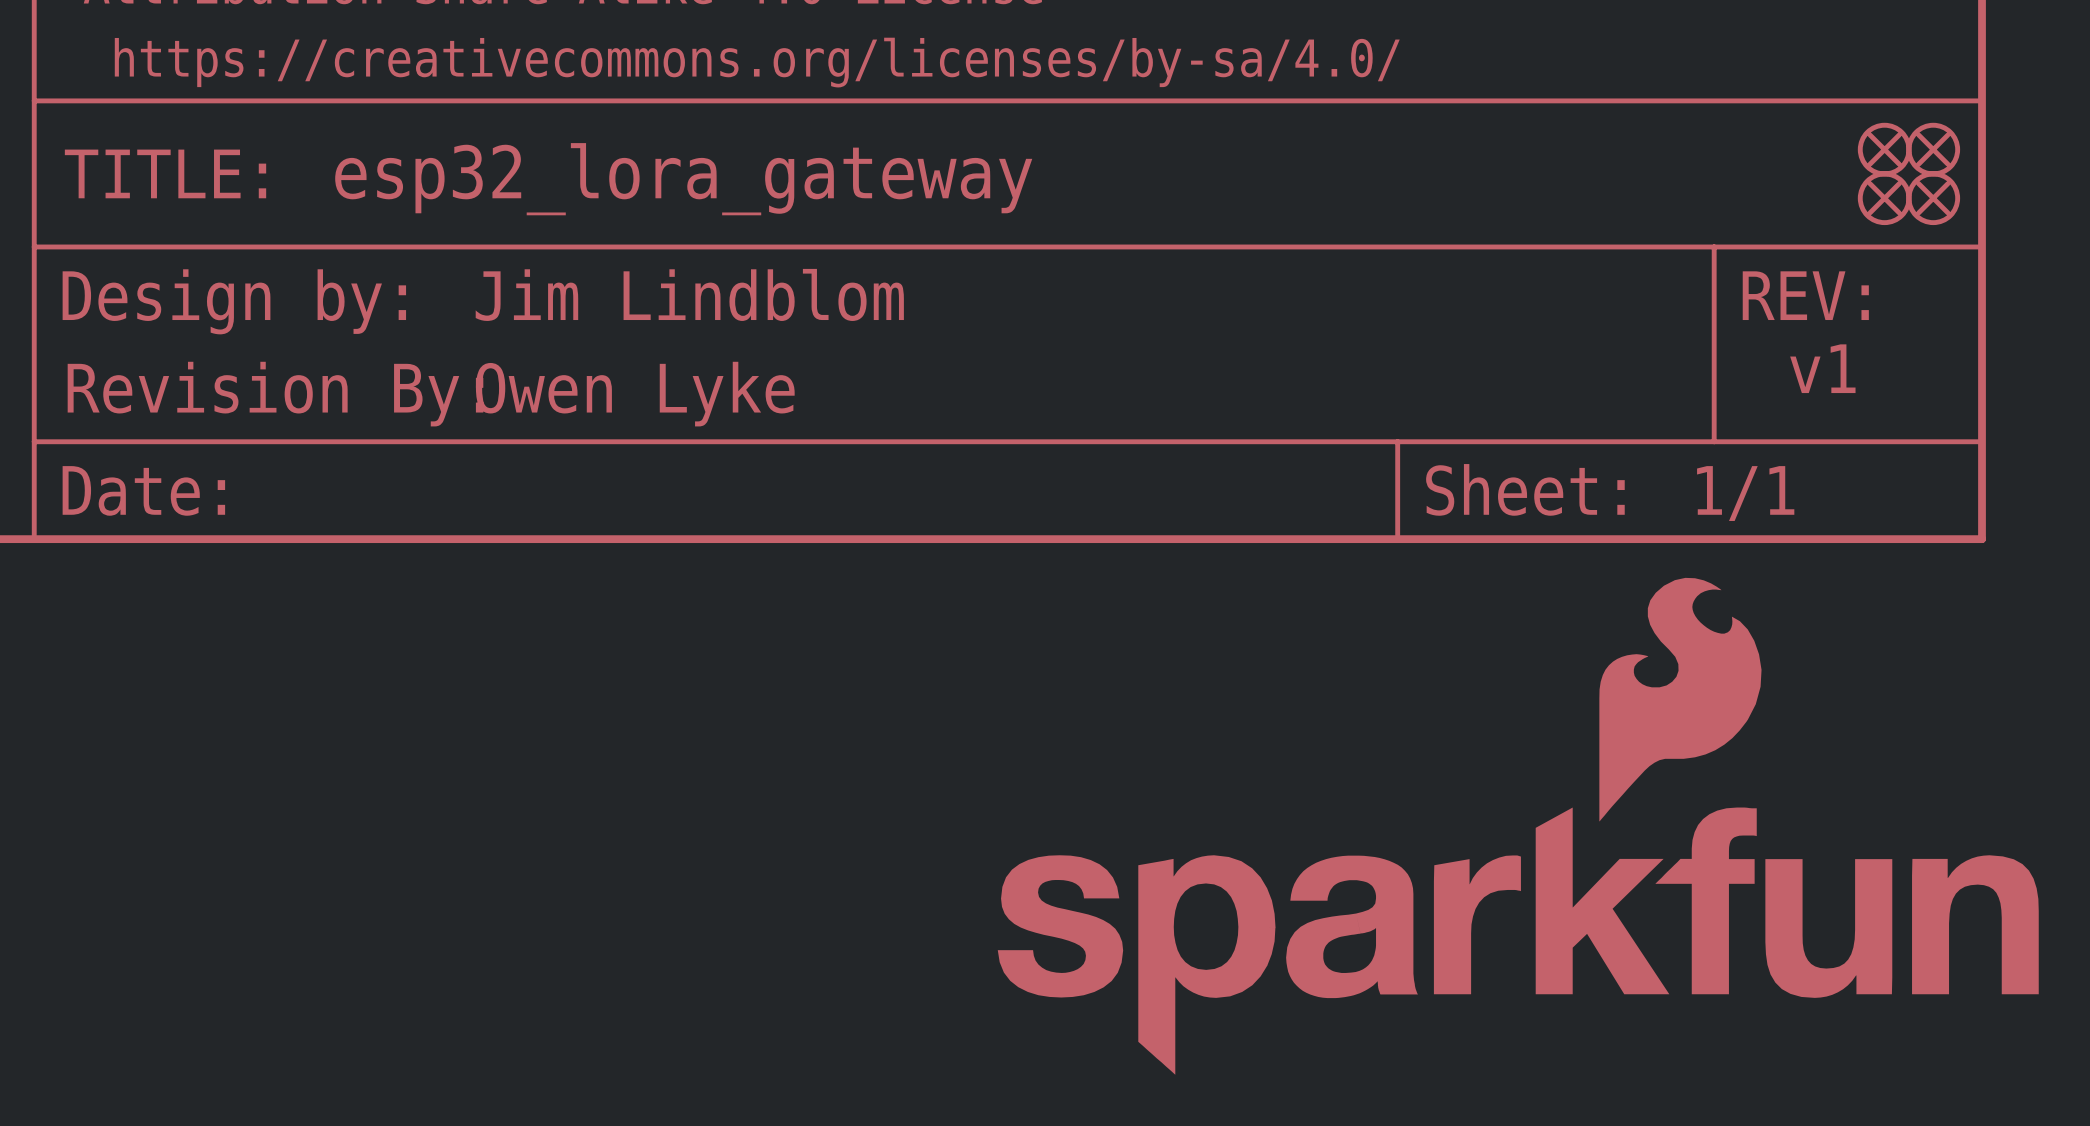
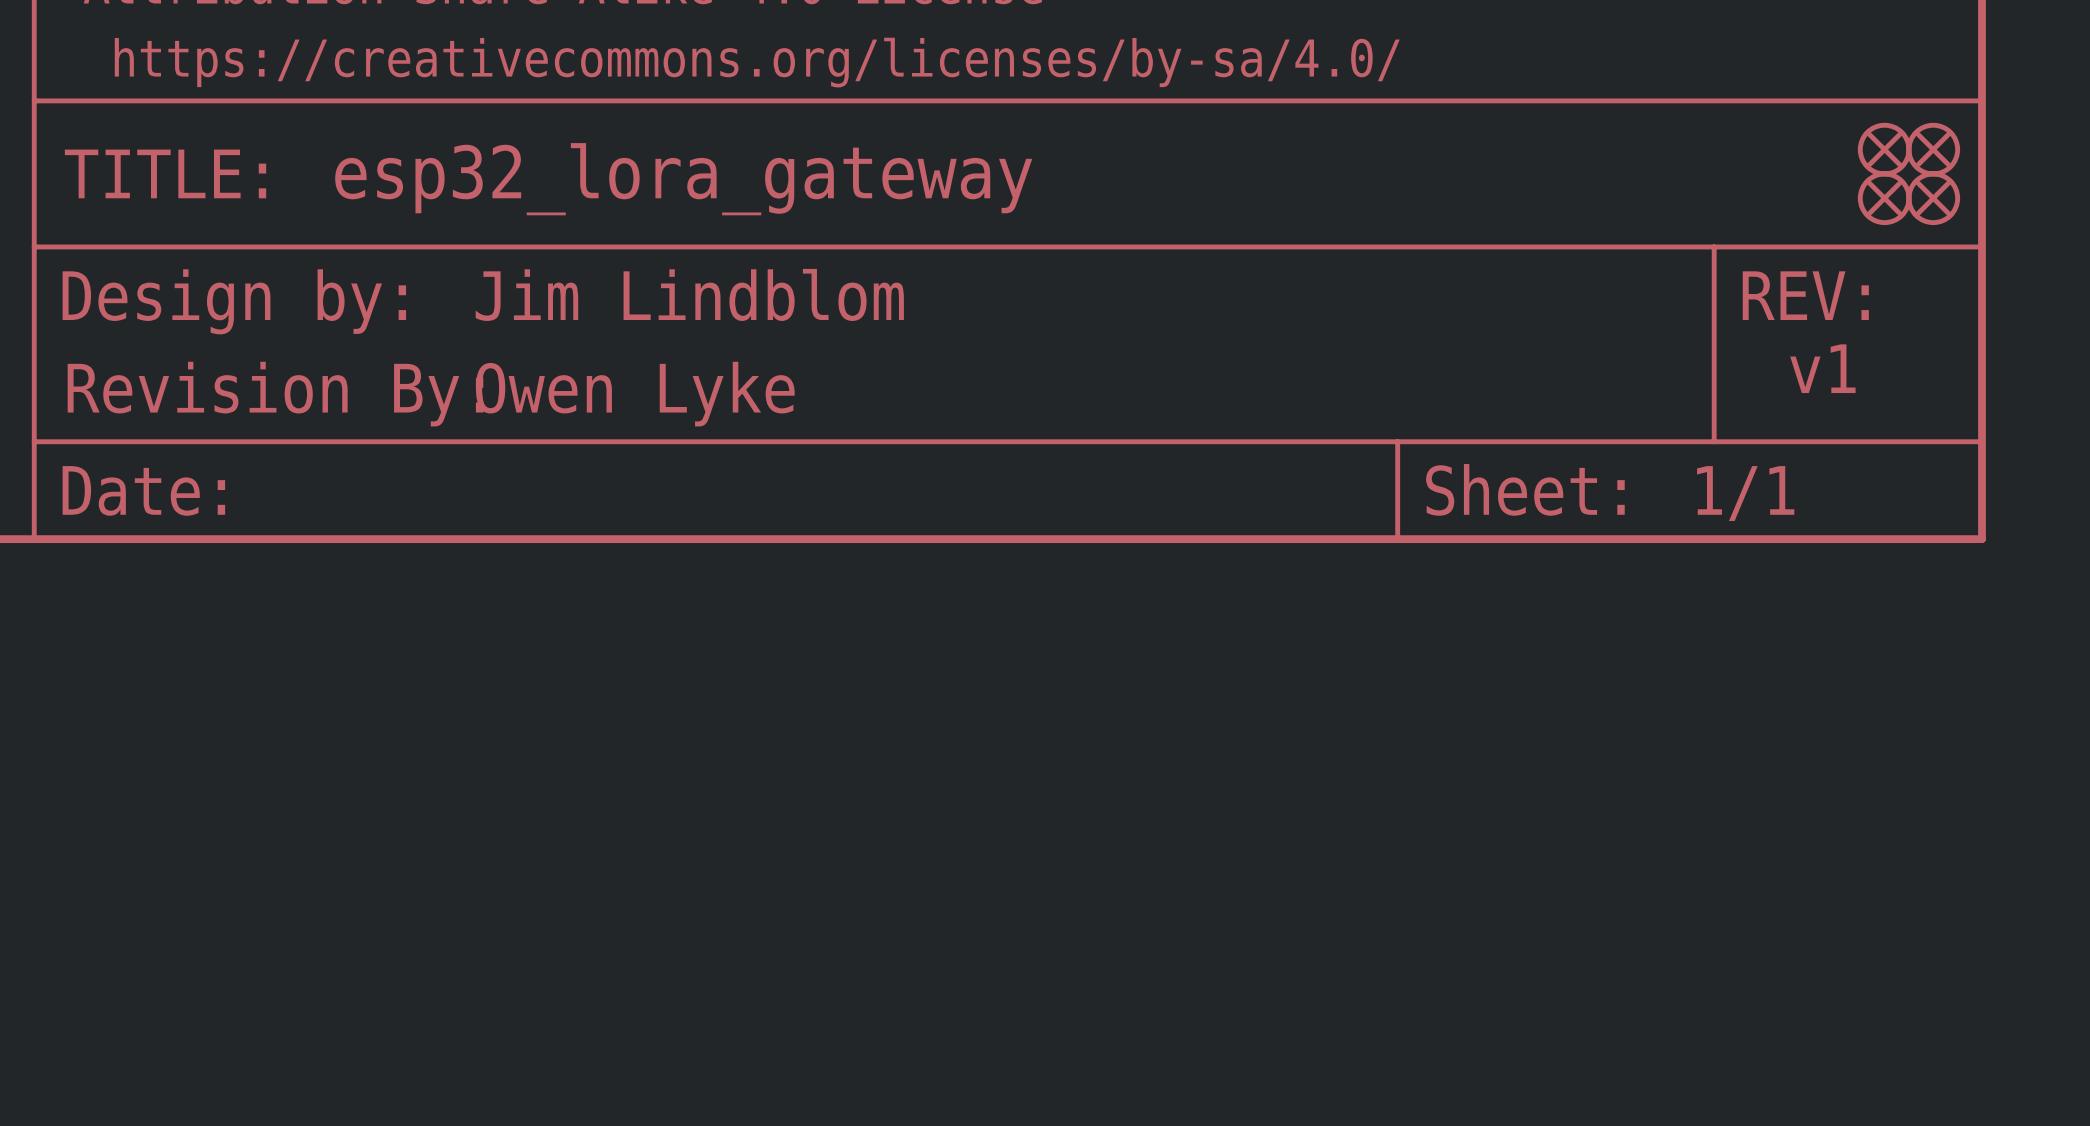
part: (1680, 699) -> none
part: (1518, 941) -> none

